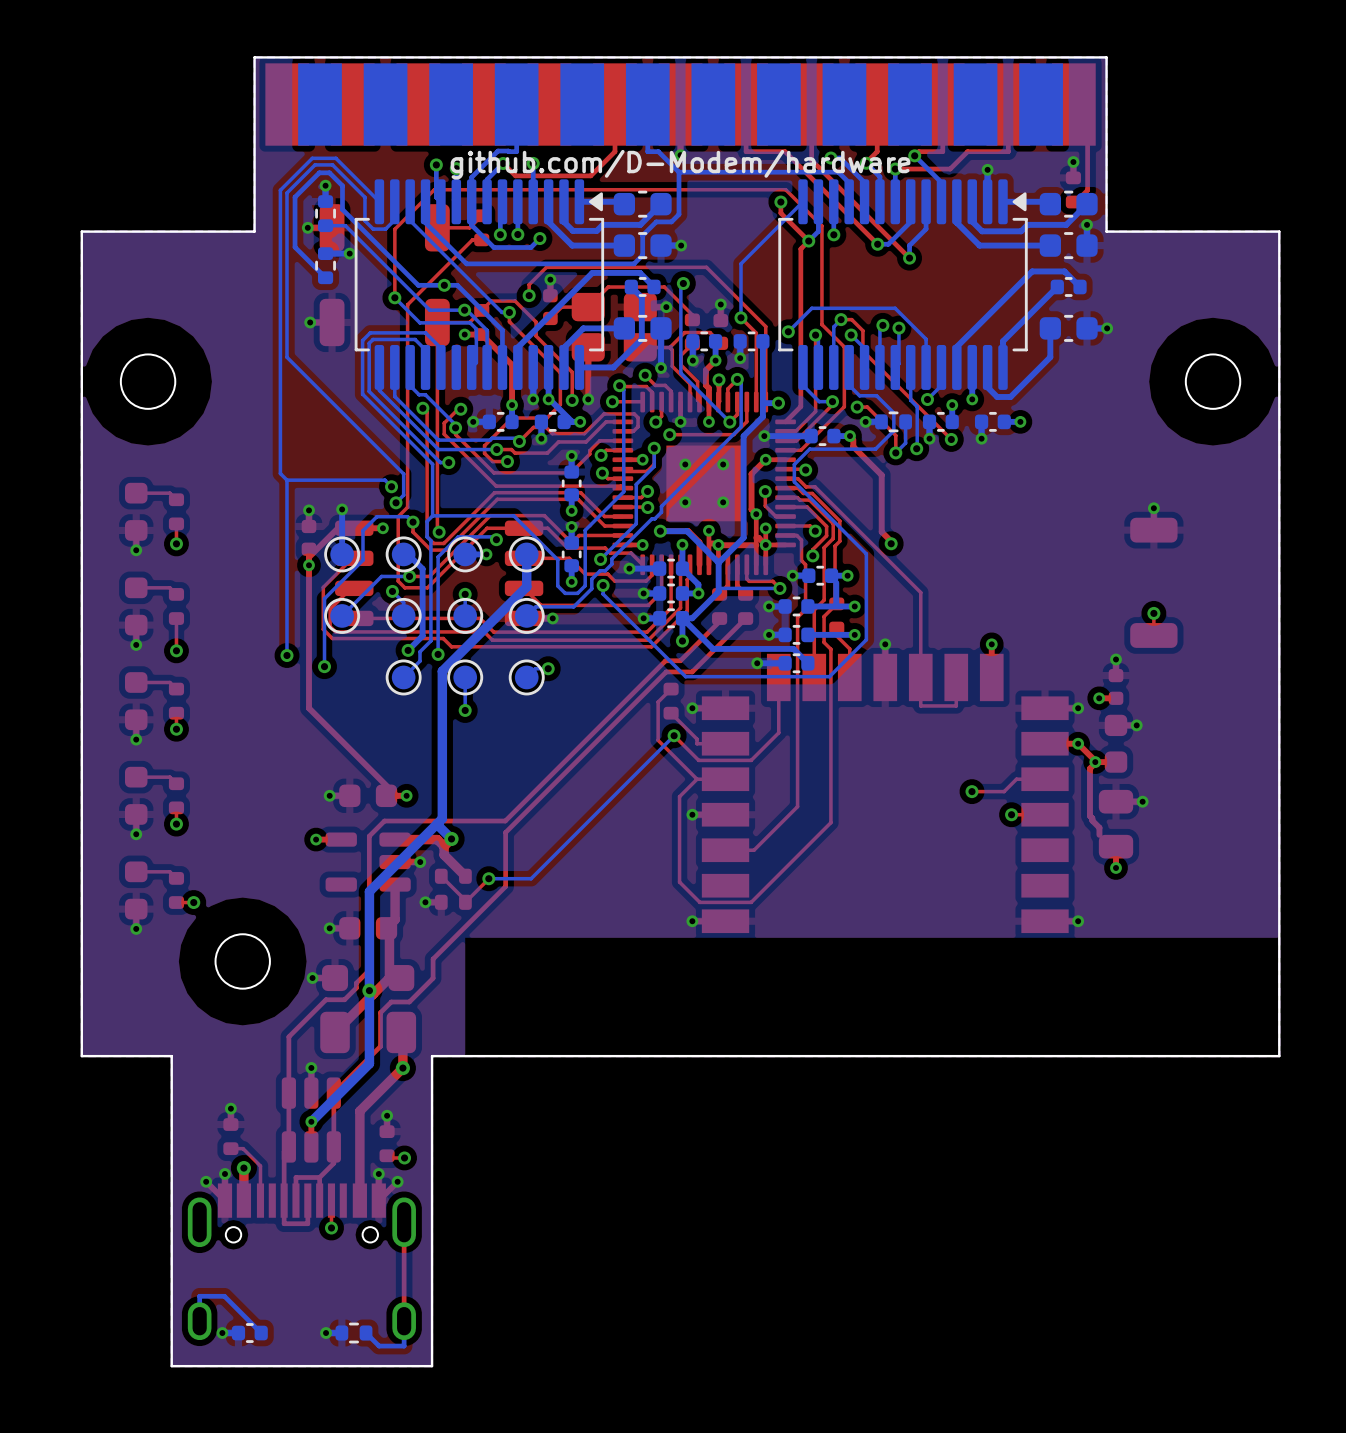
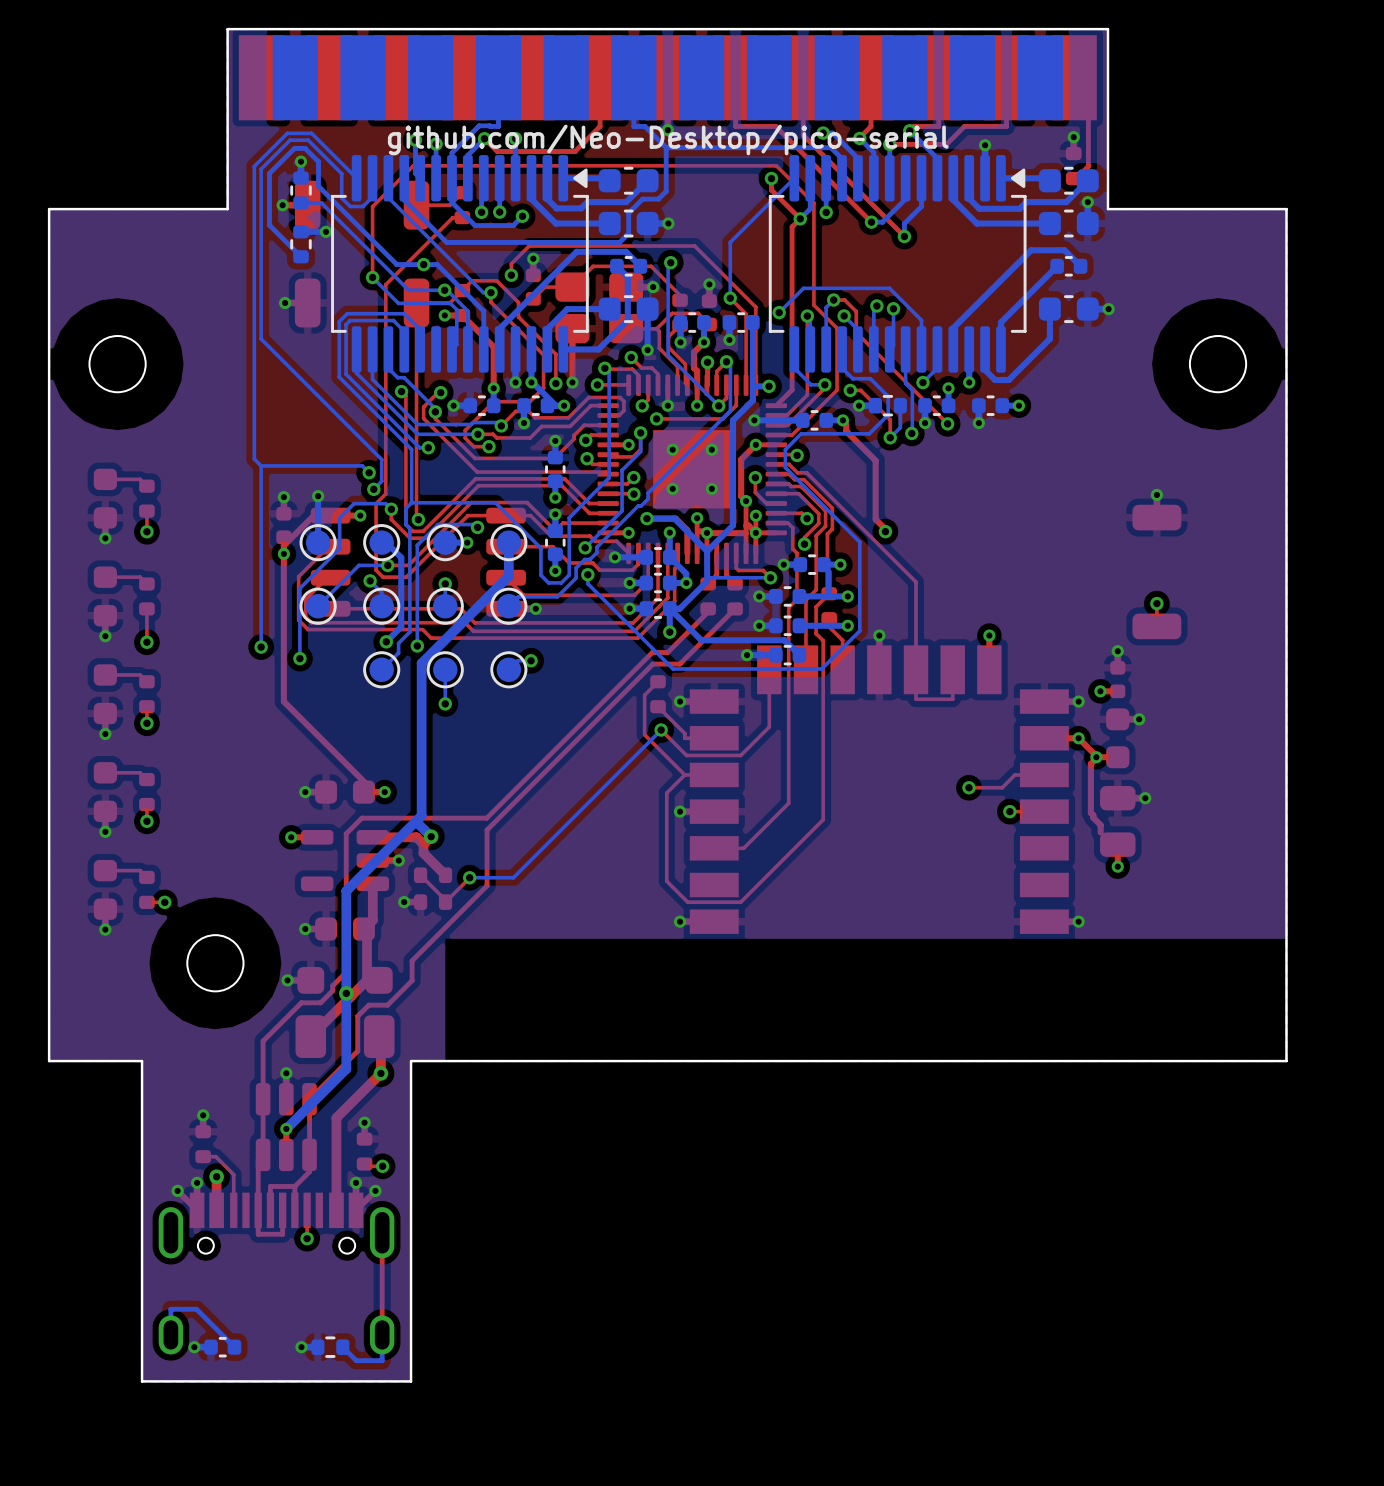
text: github.com/D-Modem/hardware (680, 164) -> github.com/Neo-Desktop/pico-serial (668, 139)

